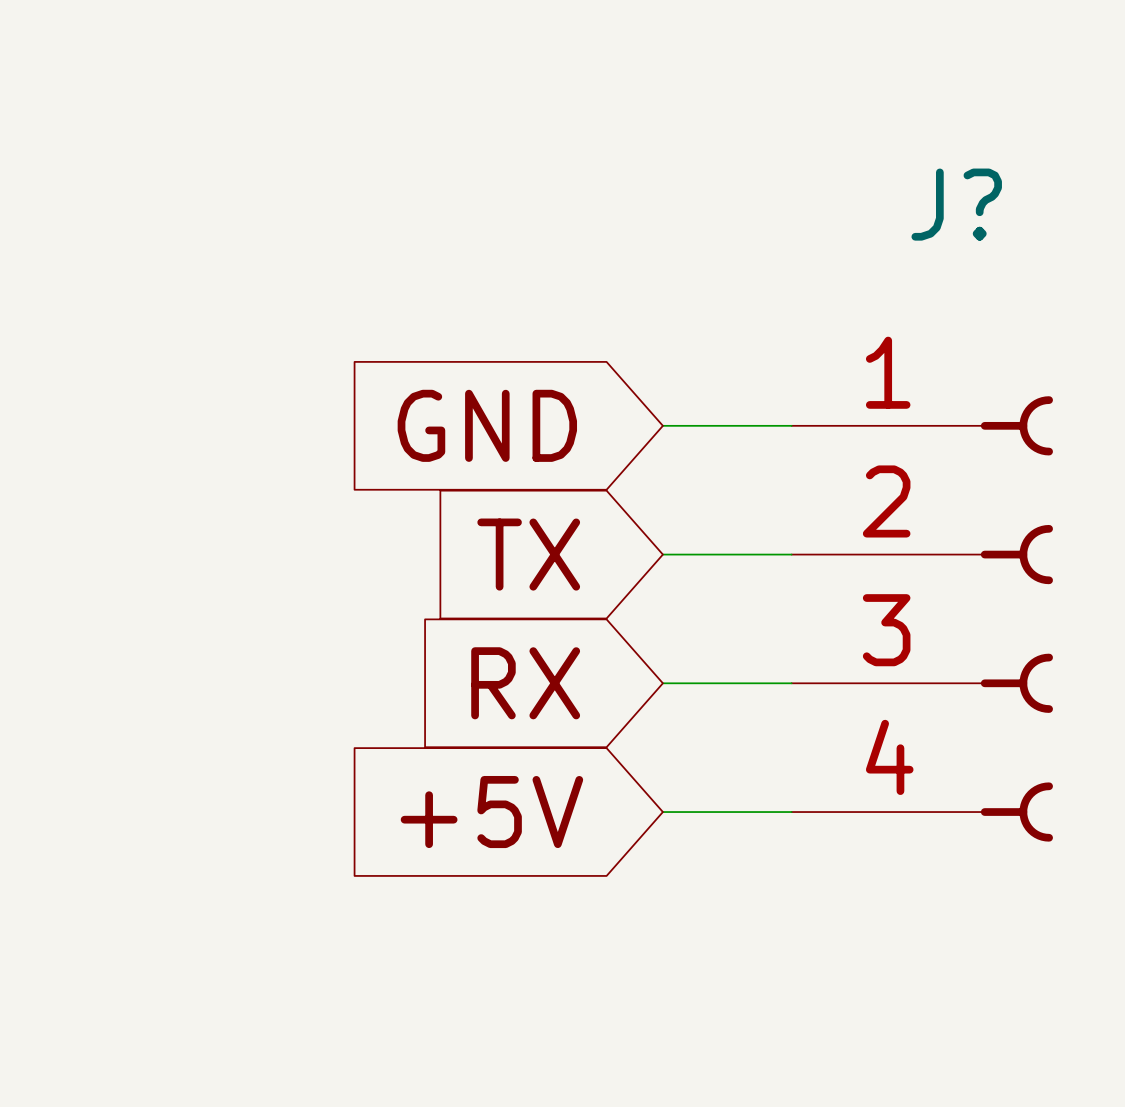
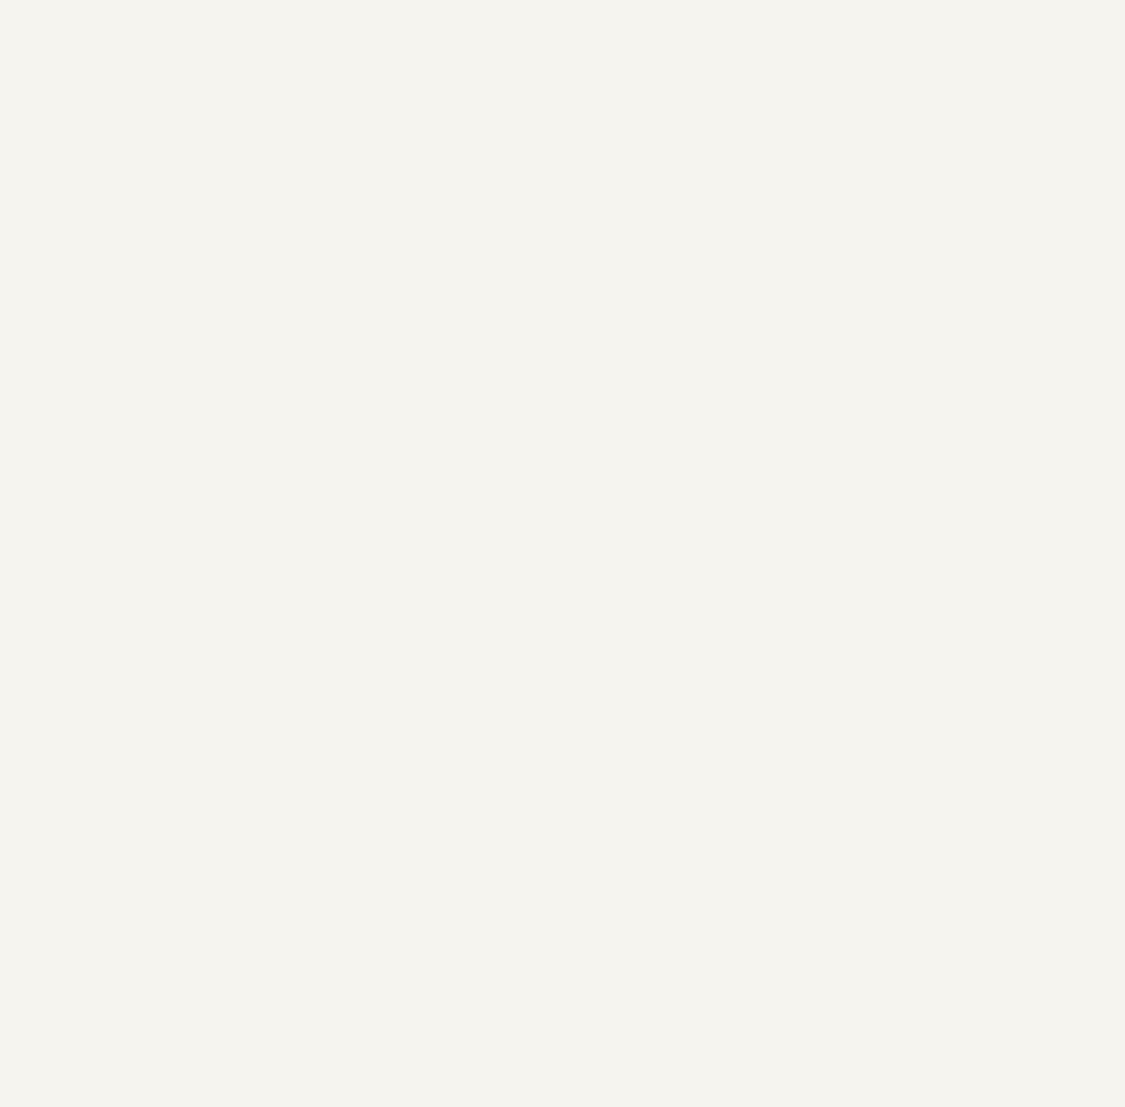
global label: GND (487, 425) -> none
wire: (662, 425) (791, 425) -> none
global label: TX (528, 554) -> none
wire: (662, 554) (791, 554) -> none
J?: (922, 618) -> none
global label: RX (525, 683) -> none
wire: (662, 683) (791, 683) -> none
global label: +5V (491, 812) -> none
wire: (662, 812) (791, 812) -> none

